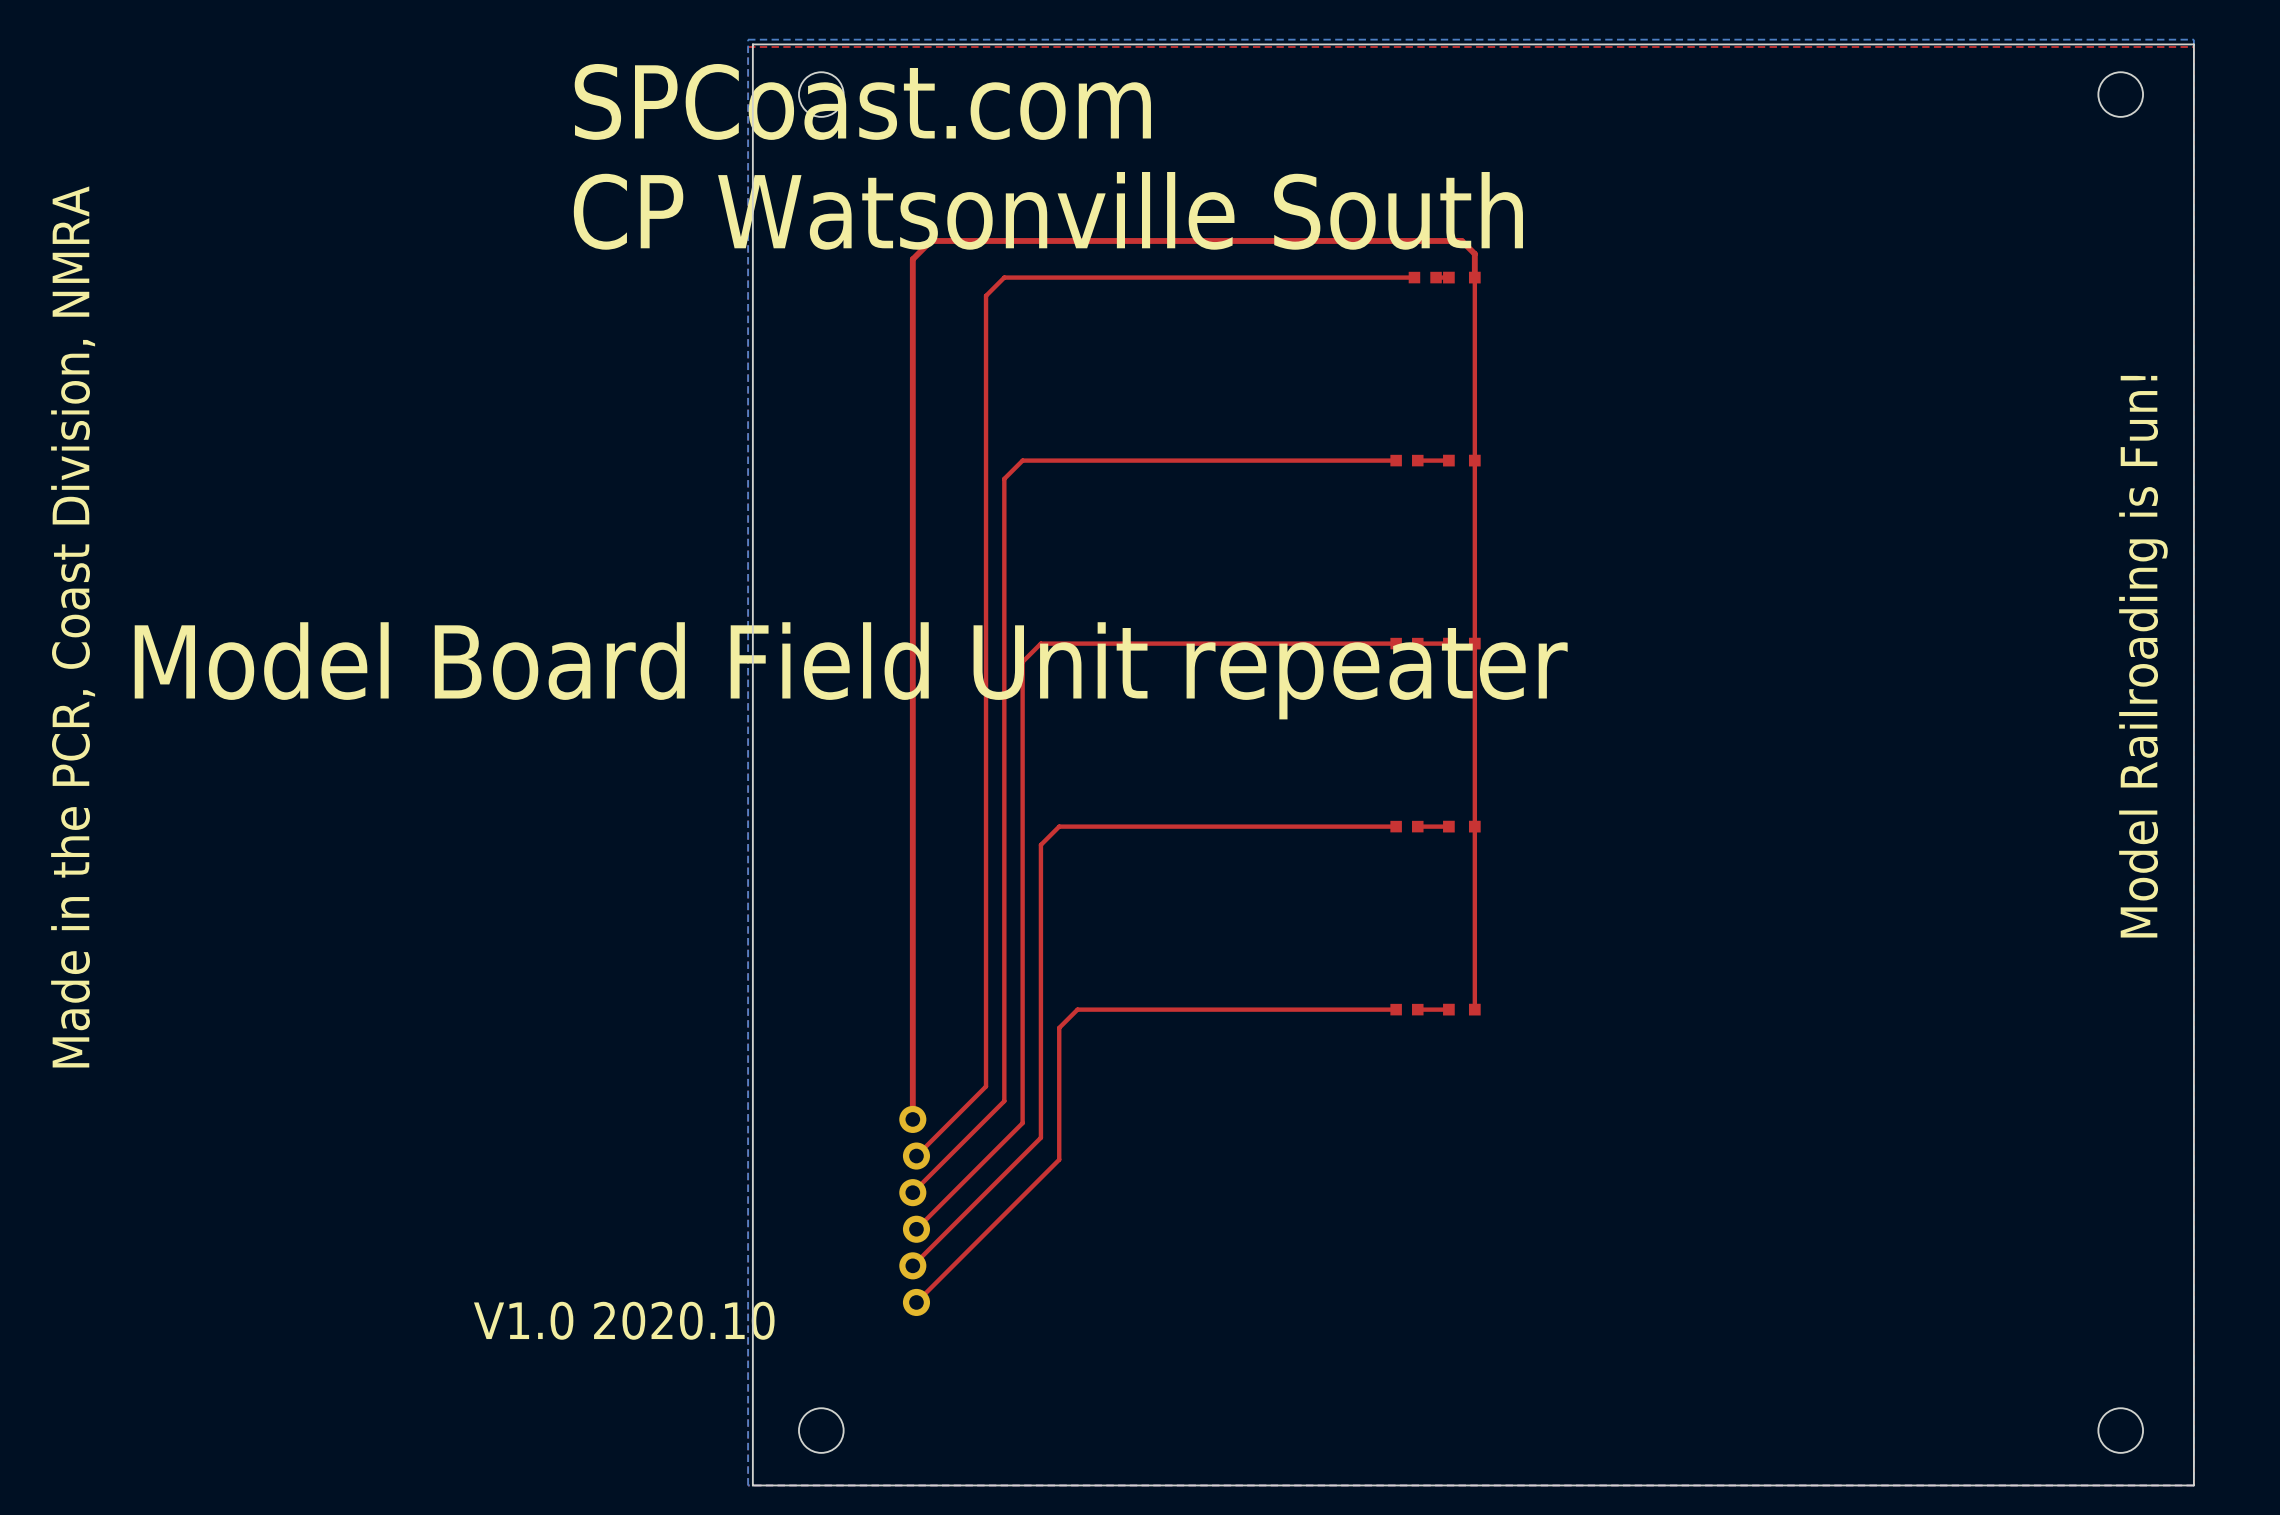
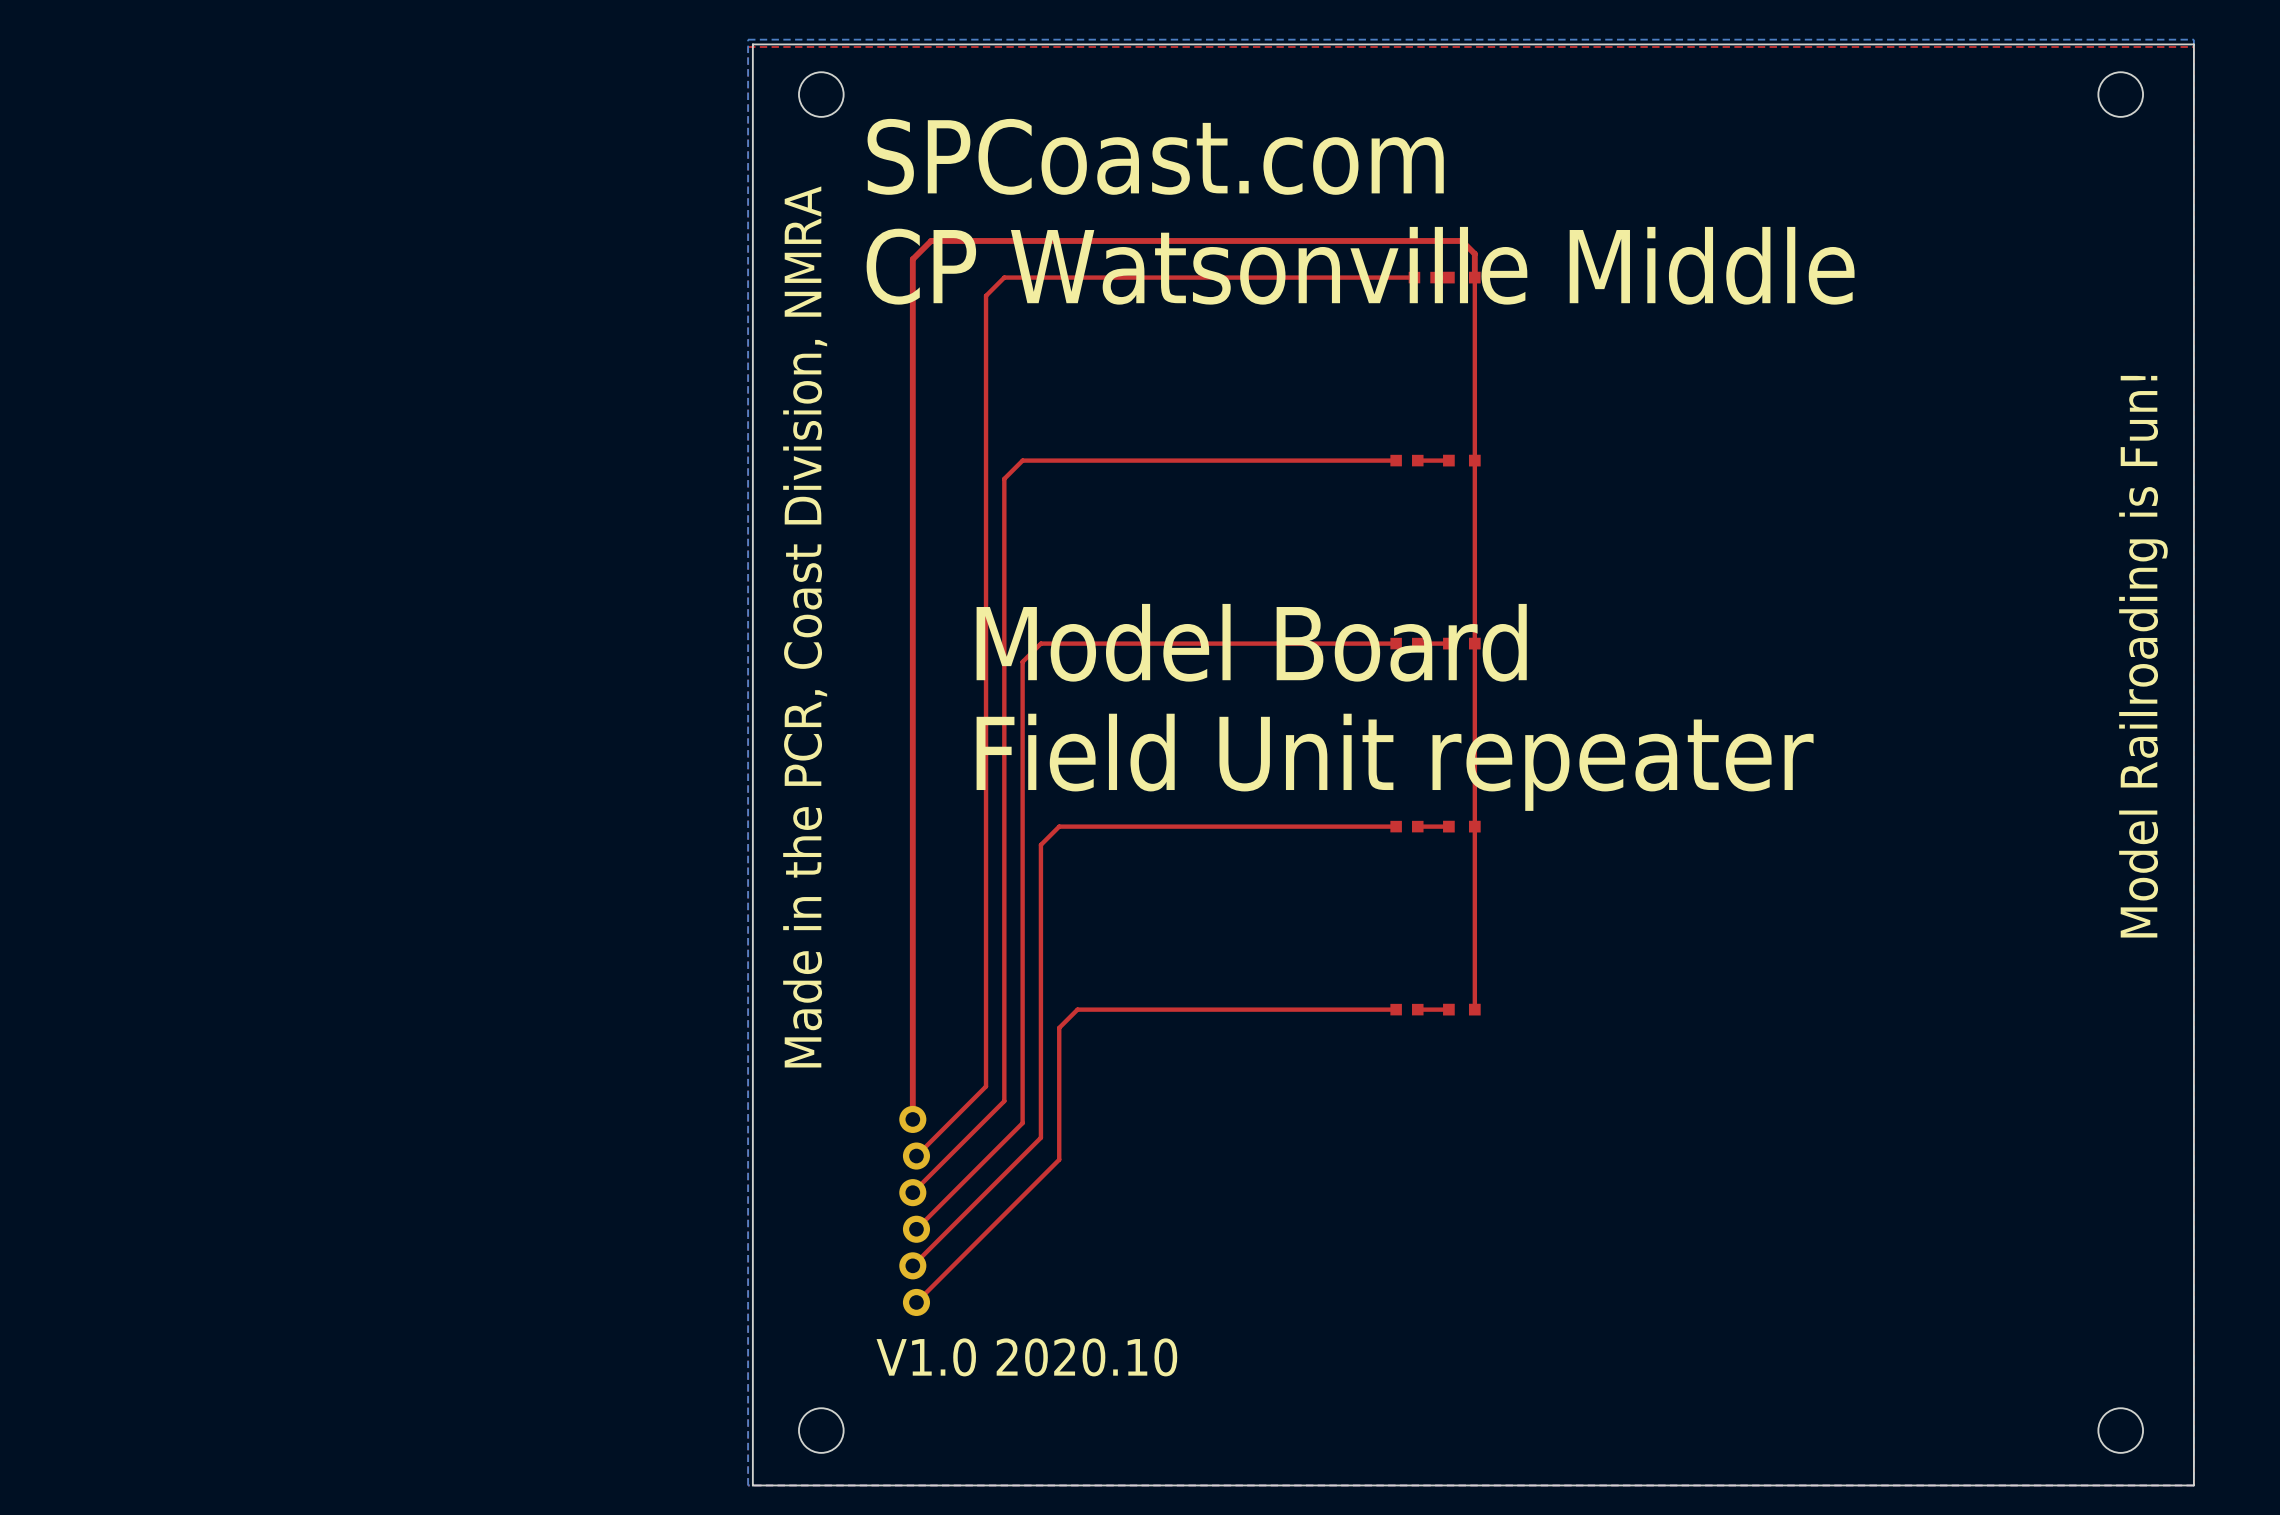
text position: SPCoast.com (862, 101) -> SPCoast.com (1155, 156)
text: CP Watsonville South (1048, 210) -> CP Watsonville Middle (1360, 265)
text: Made in the PCR, Coast Division, NMRA (73, 626) -> none
text: none -> Made in the PCR, Coast Division, NMRA (805, 626)
text: none -> Model Board (1251, 642)
text: Model Board Field Unit repeater (851, 670) -> none
text: none -> Field Unit repeater (1395, 762)
text: V1.0 2020.10 (624, 1320) -> none
text: none -> V1.0 2020.10 (1026, 1357)

